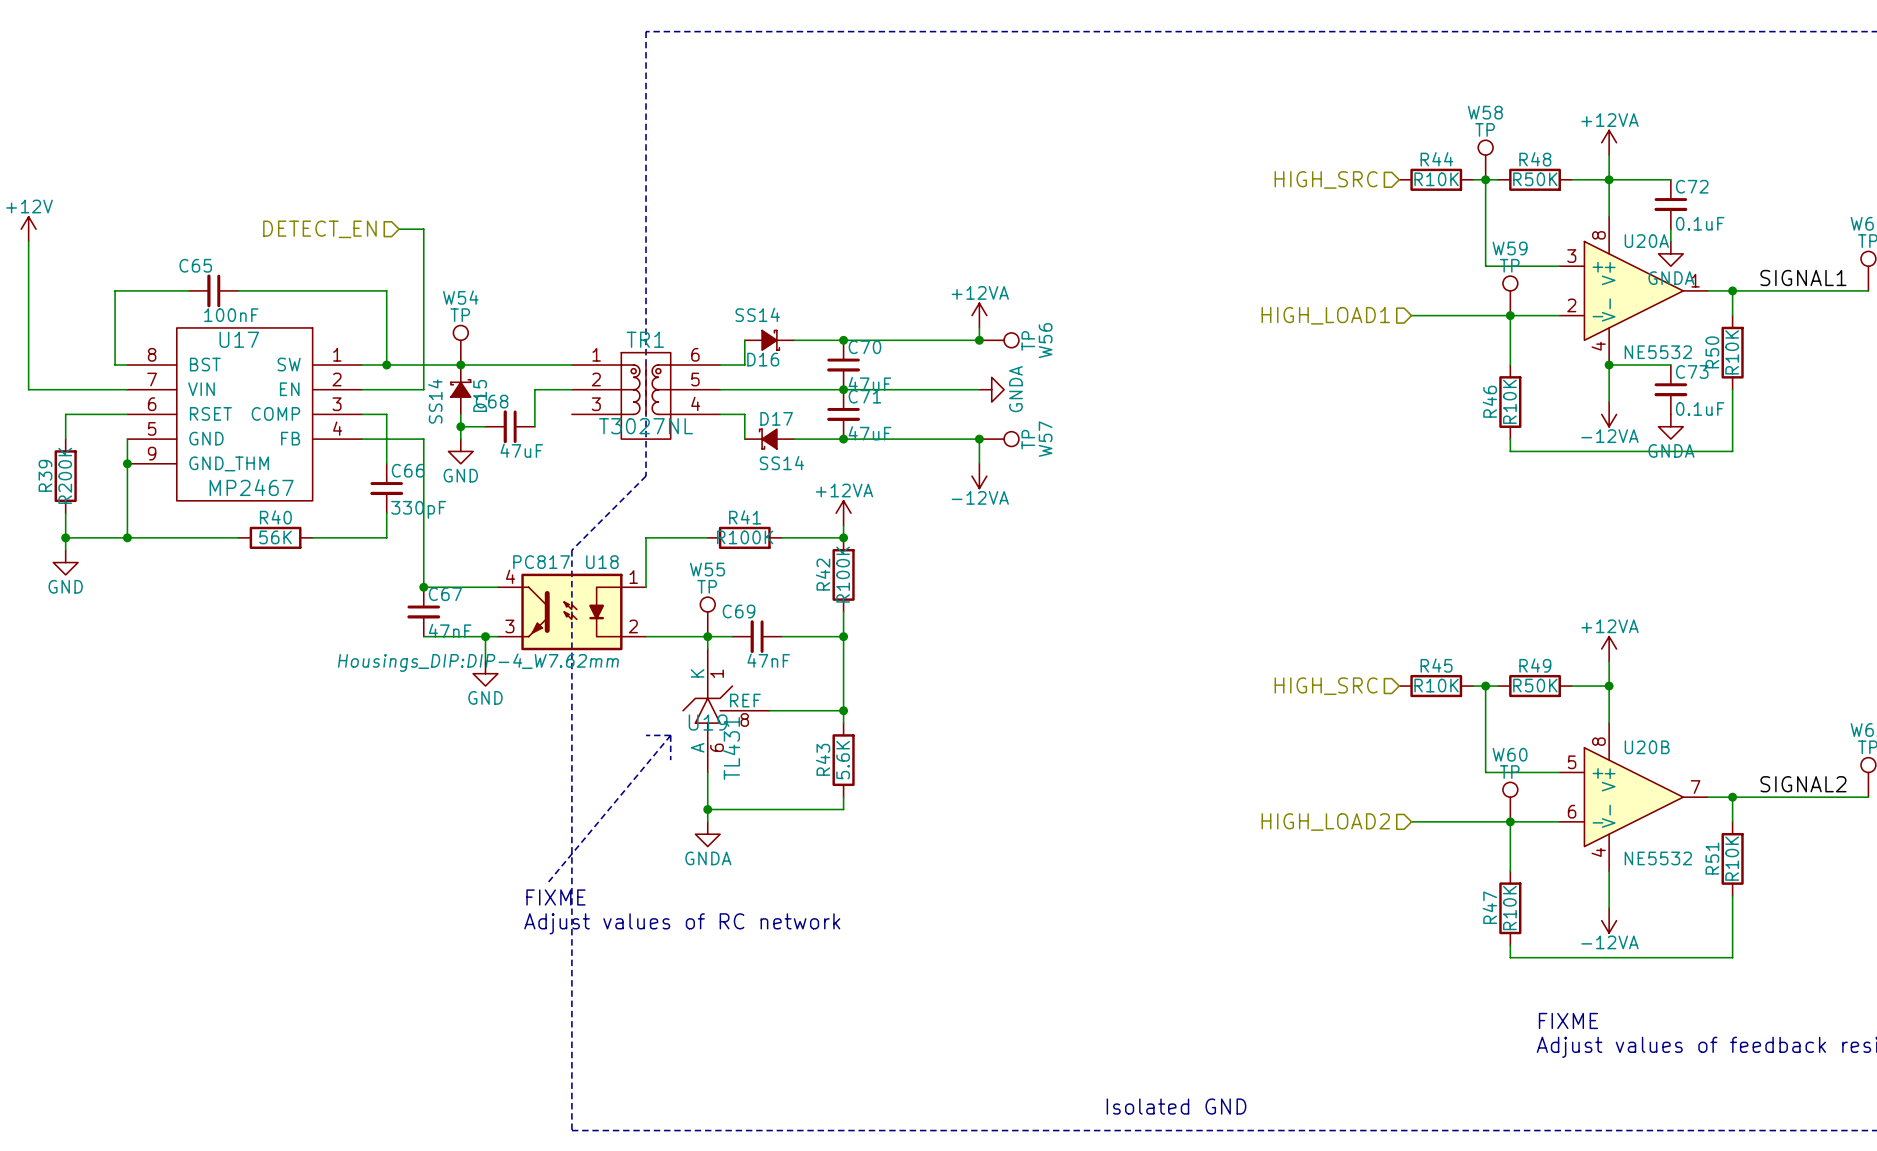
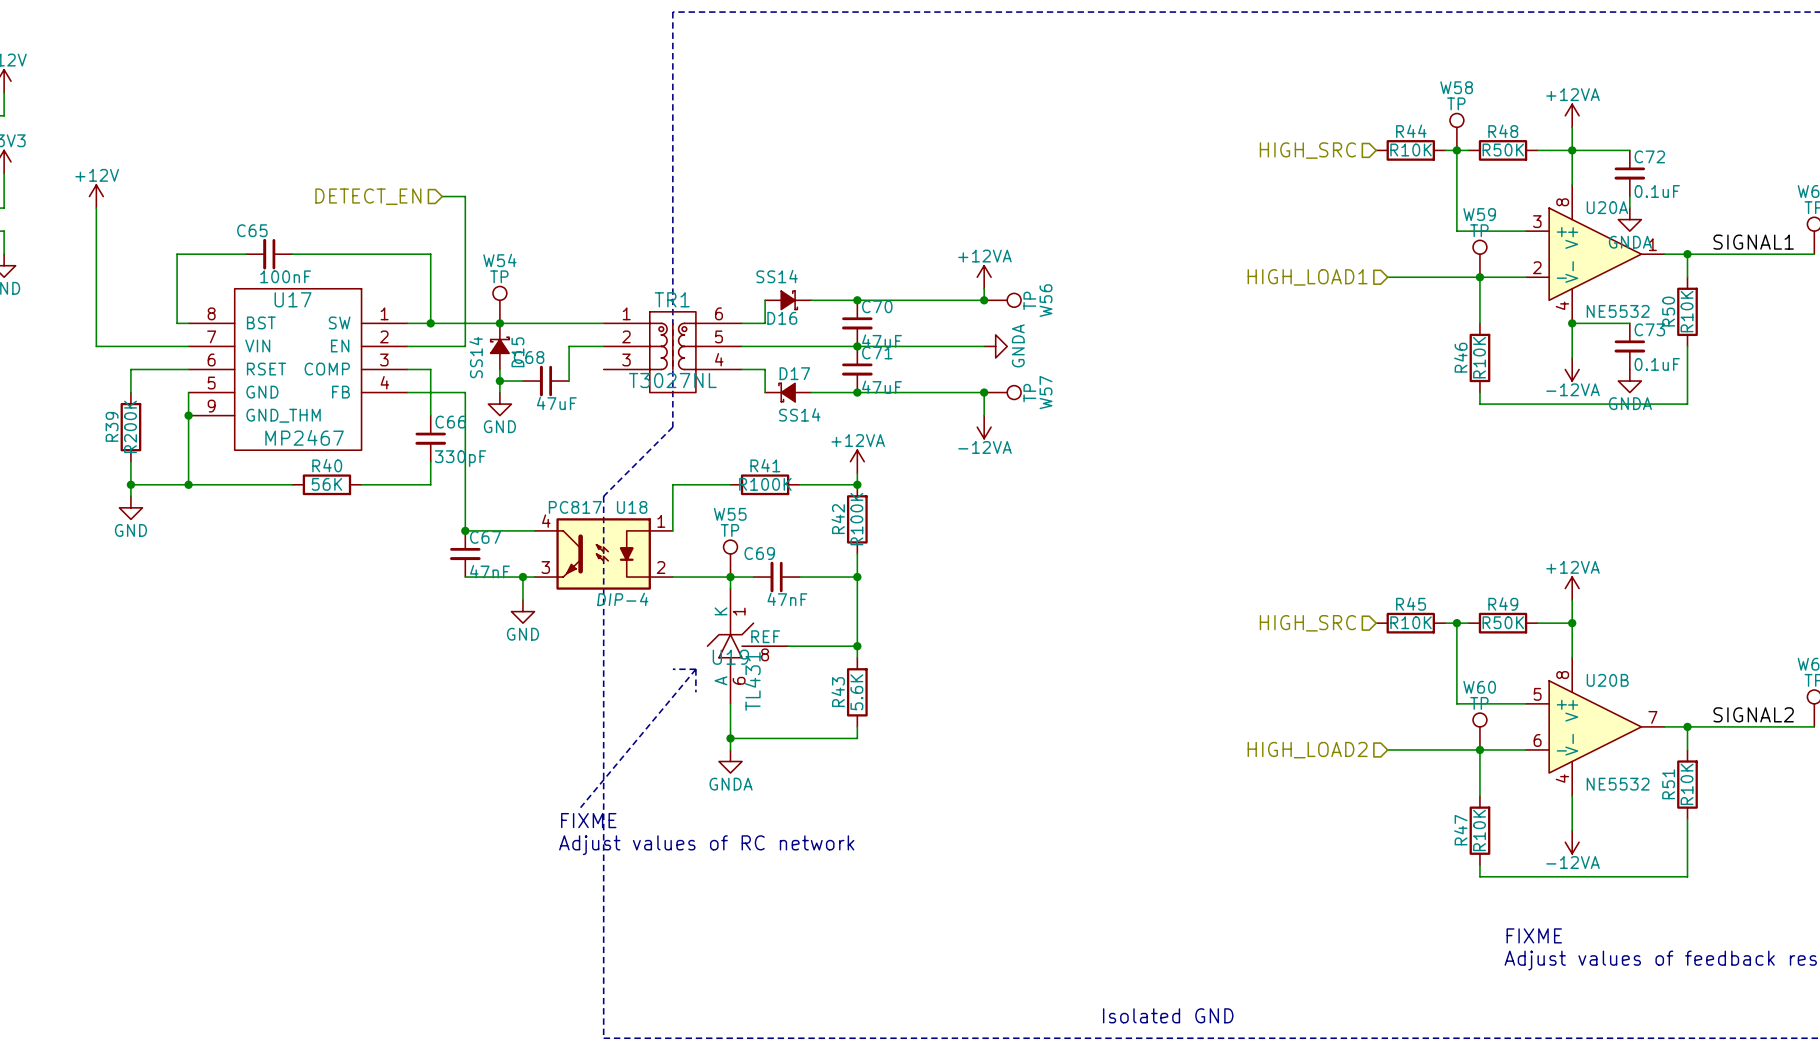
U18 text: Housings_DIP:DIP-4_W7.62mm (478, 662) -> DIP-4 (622, 599)

